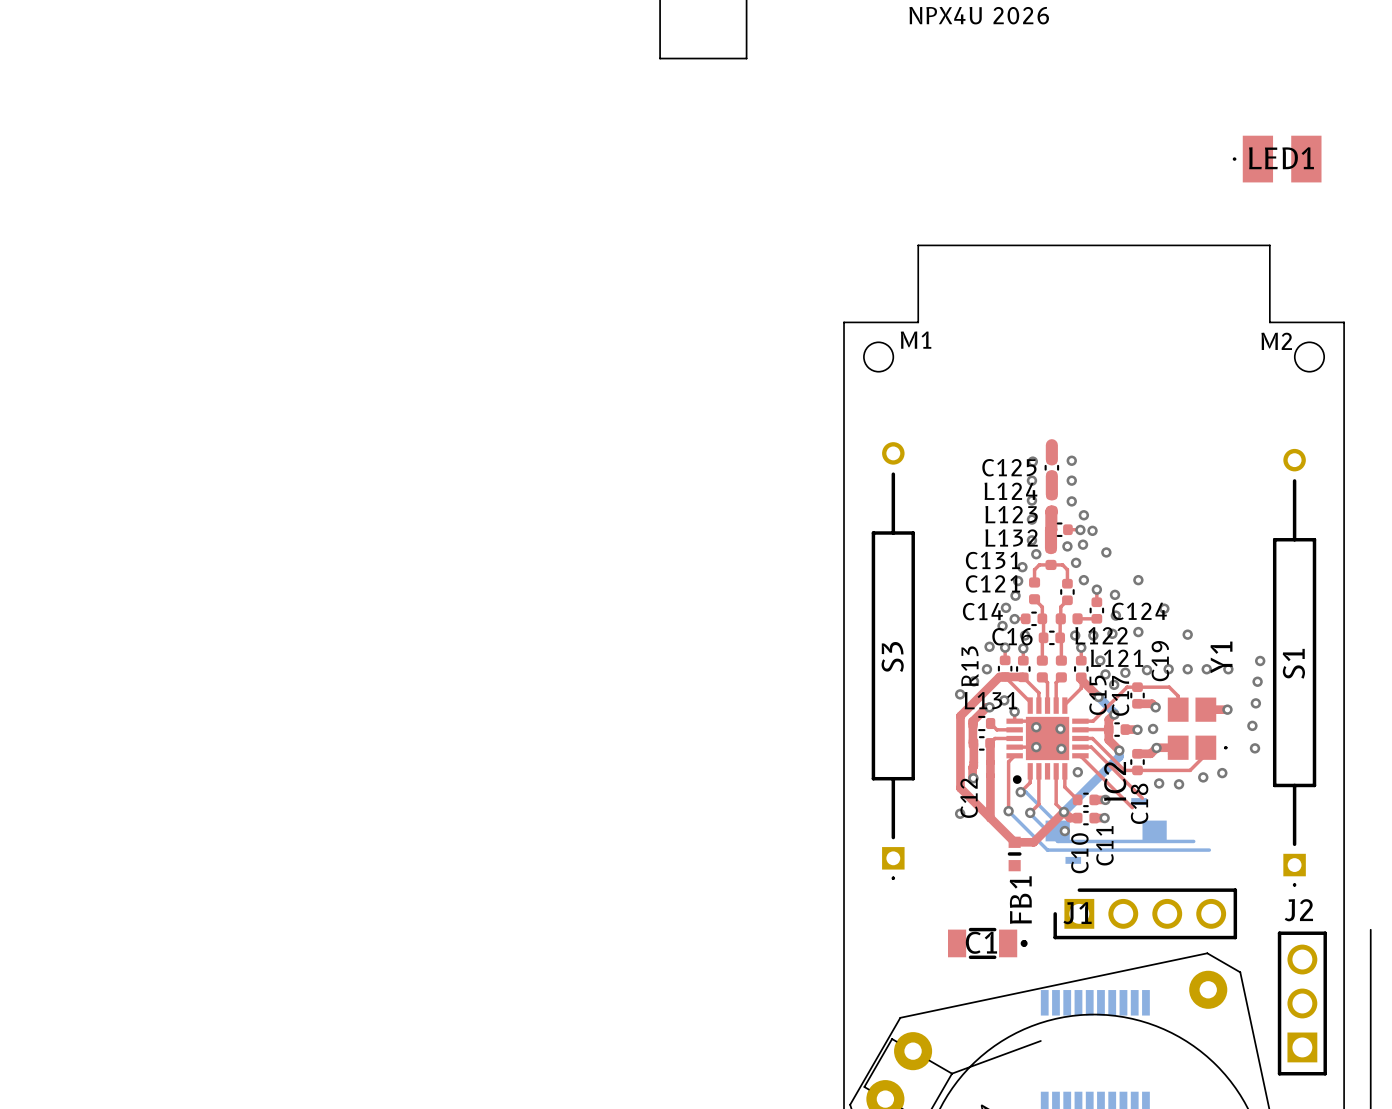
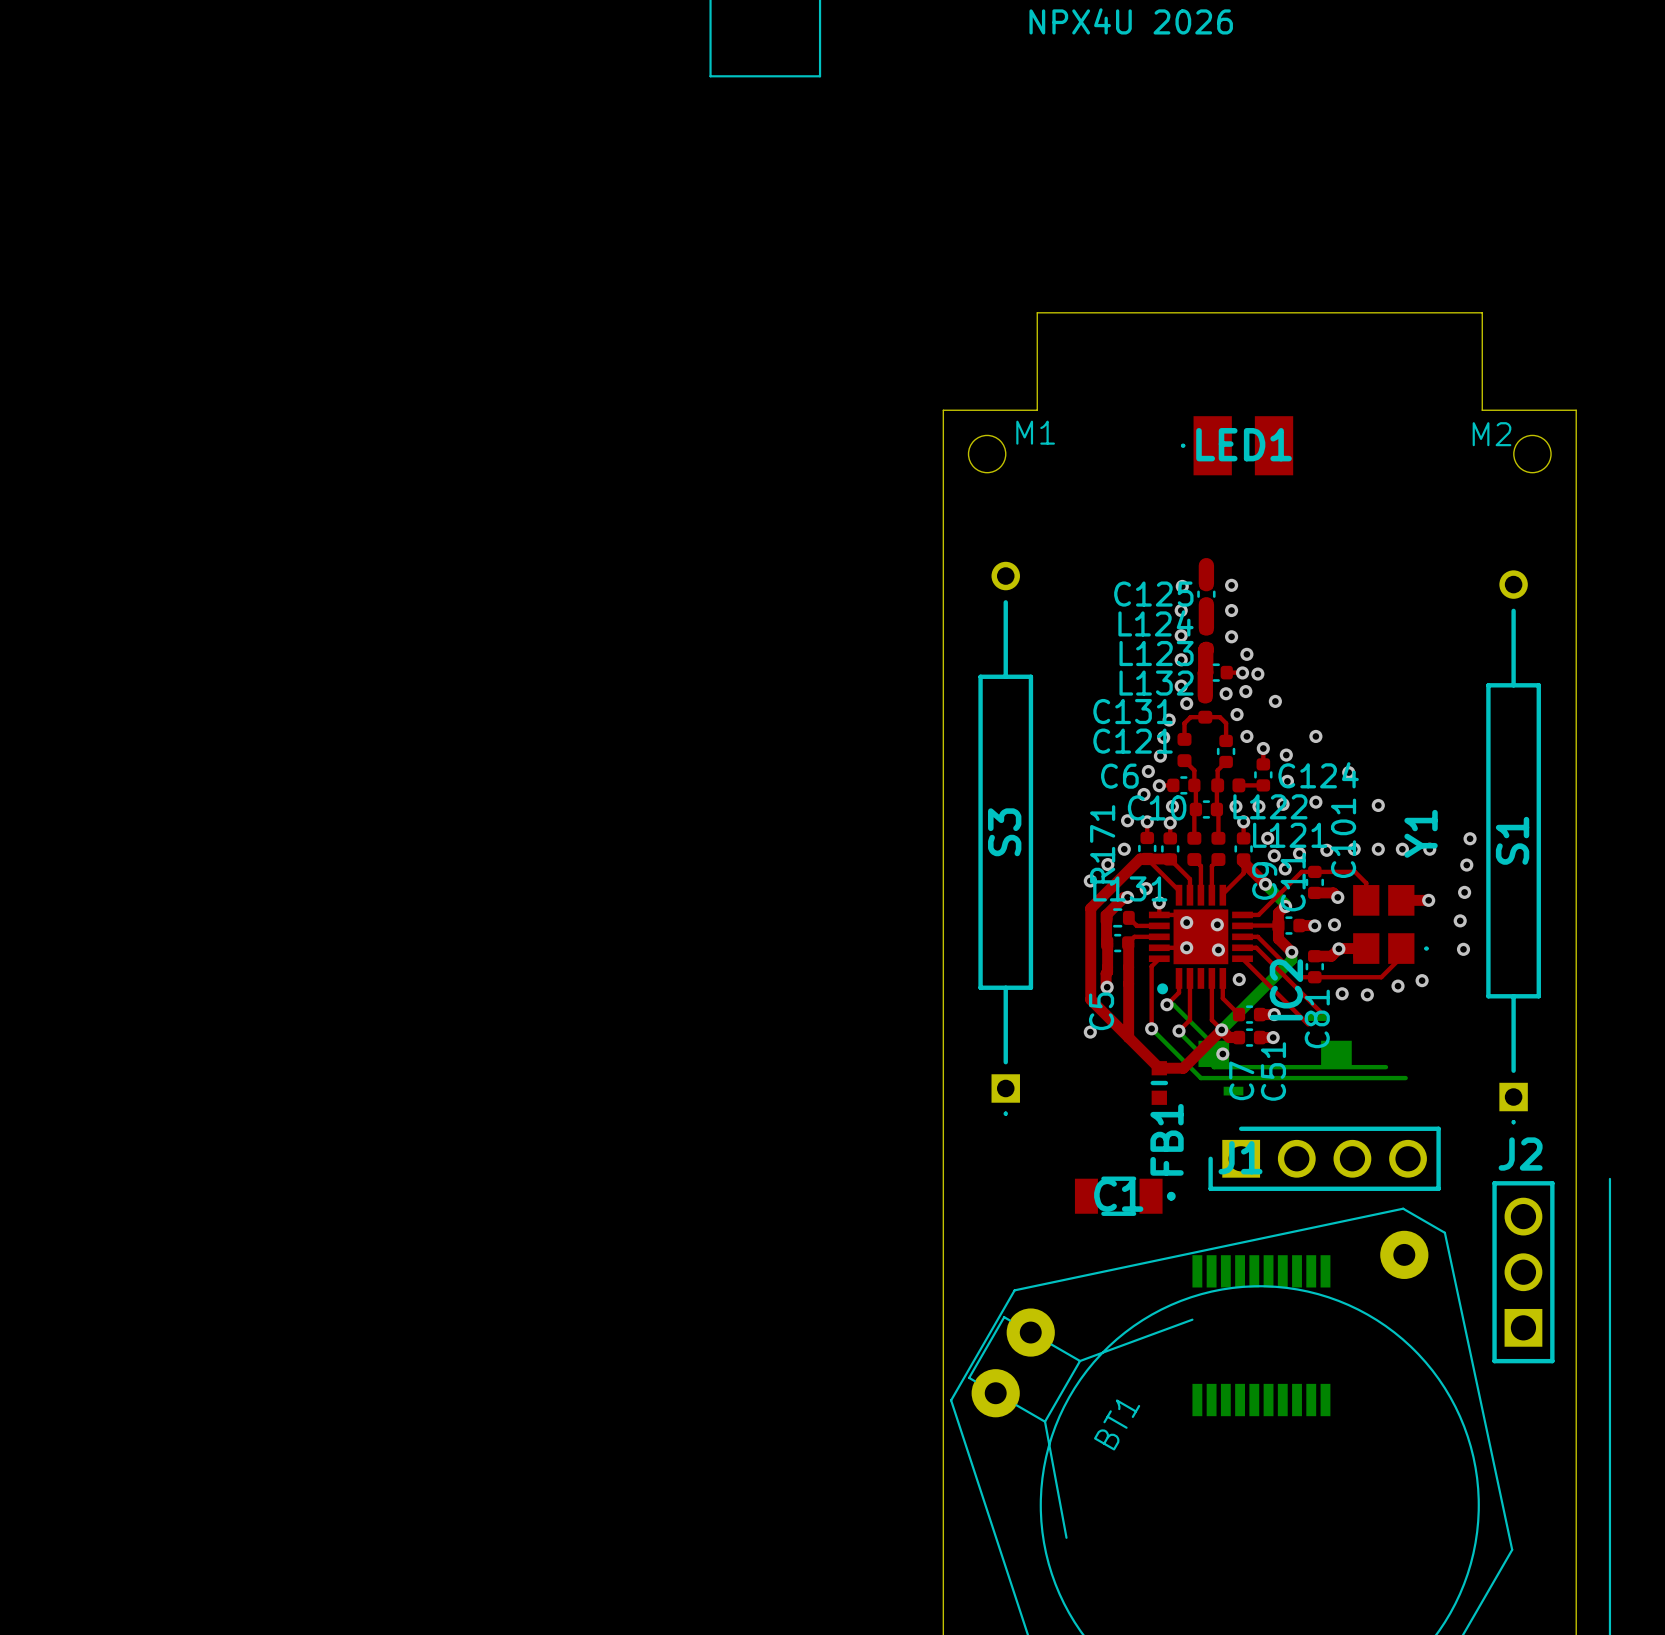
LED1 position: (1277, 159) -> (1237, 445)
C14 name: C14 (982, 611) -> C6 (1119, 776)
C16 name: C16 (1012, 636) -> C10 (1157, 807)
C19 name: C19 (1160, 661) -> C101 (1343, 838)
R13 name: R13 (969, 666) -> R171 (1102, 844)
C15 name: C15 (1098, 695) -> C9 (1264, 880)
C17 name: C17 (1120, 695) -> C11 (1293, 882)
C12 name: C12 (969, 798) -> C5 (1101, 1011)
C18 name: C18 (1139, 803) -> C81 (1317, 1018)
C11 name: C11 (1104, 845) -> C51 (1273, 1071)
C10 name: C10 (1079, 853) -> C7 (1241, 1080)

